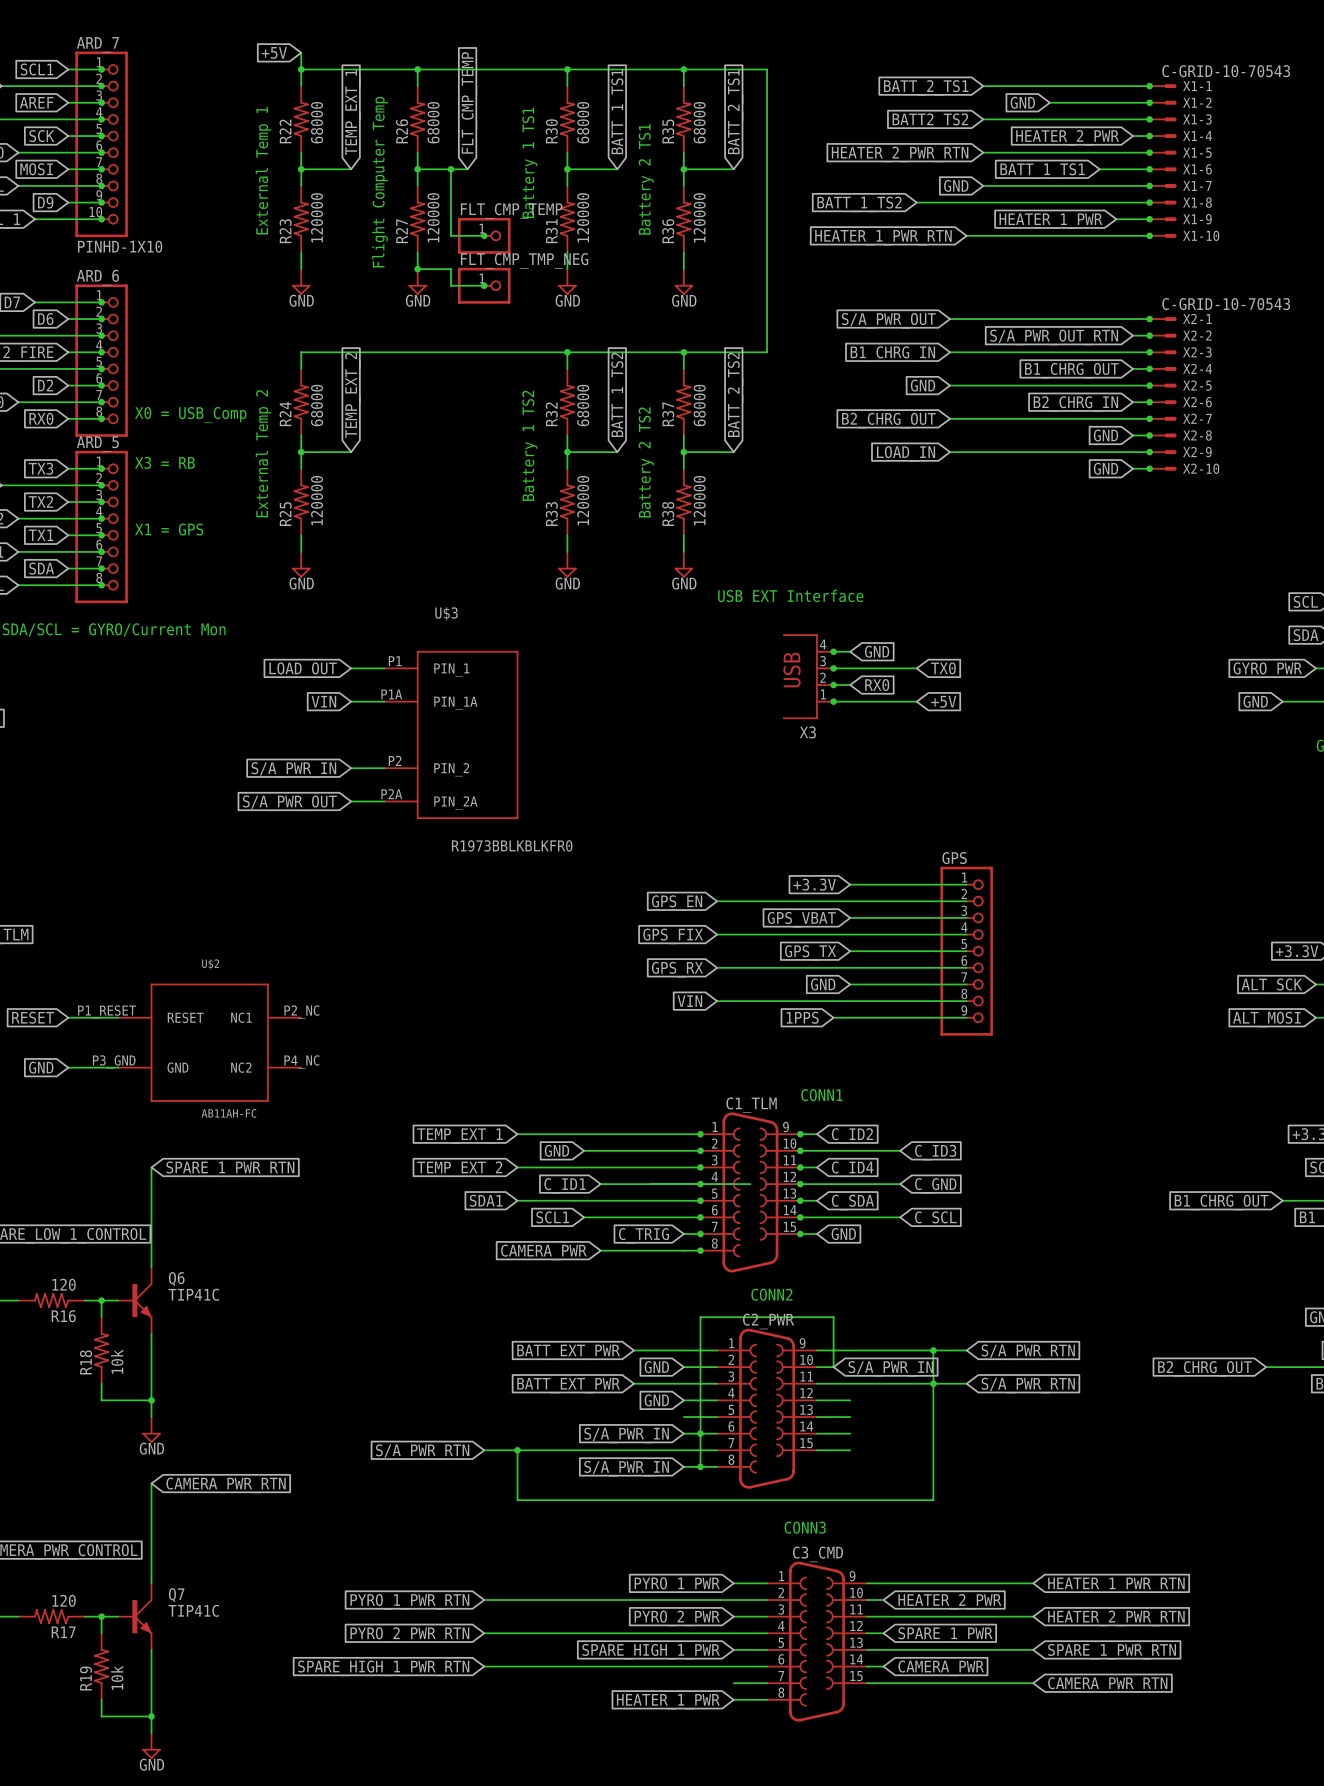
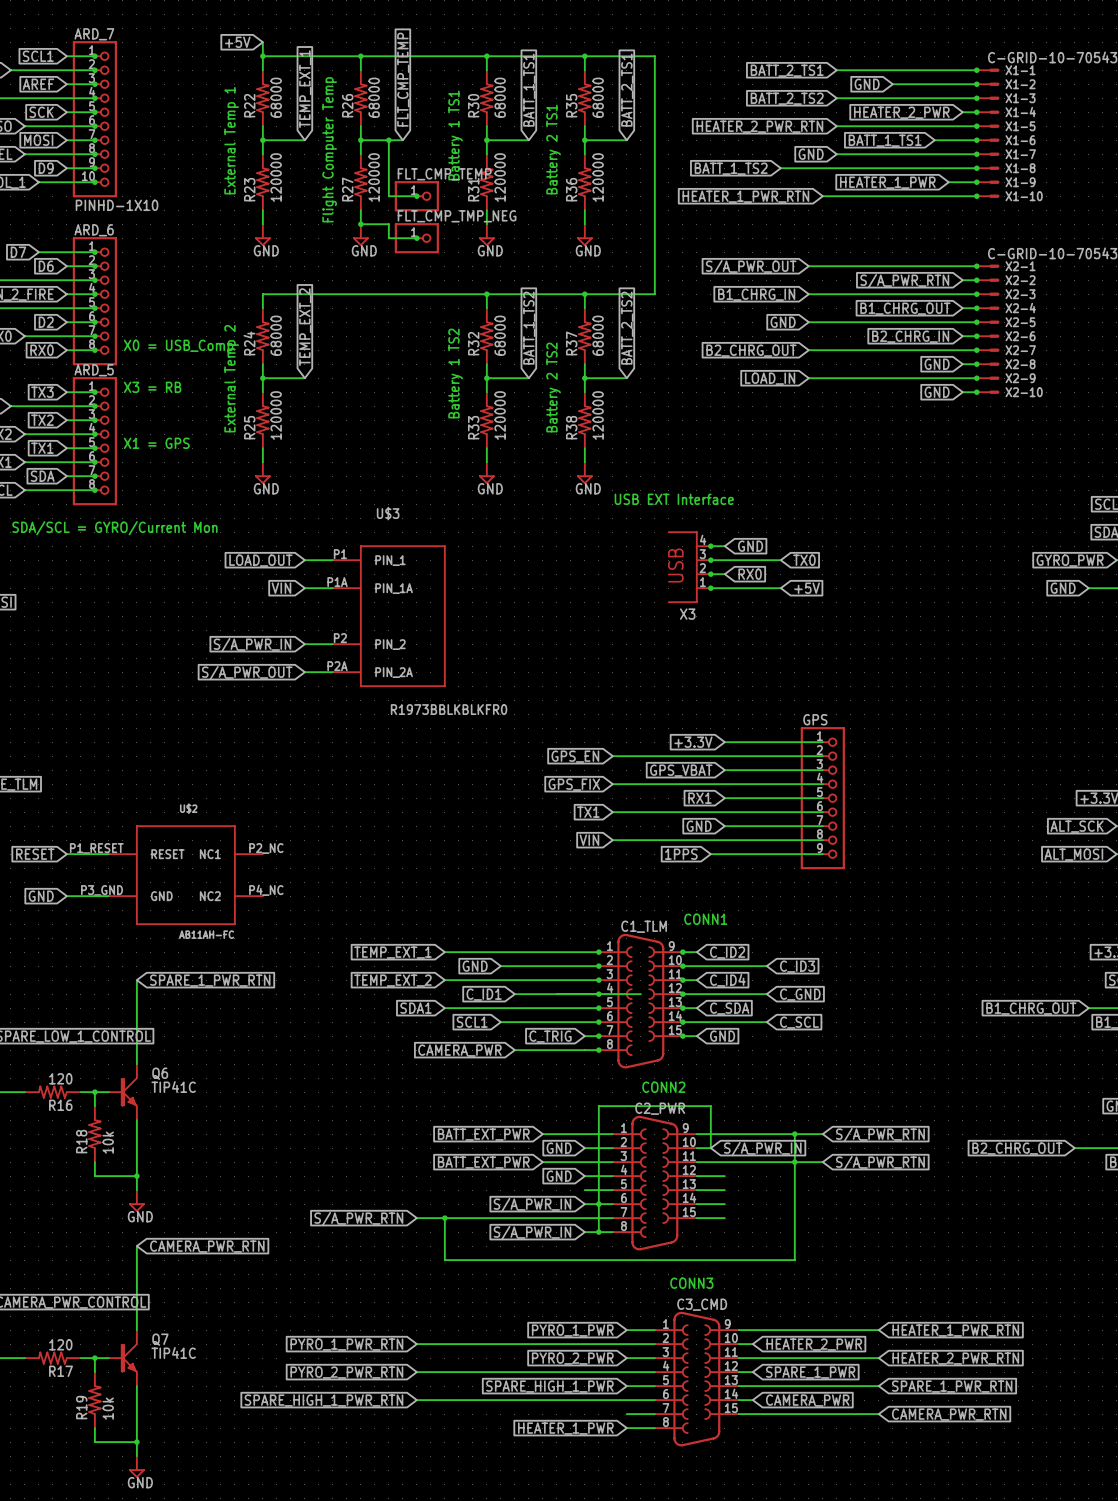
global label: BATT2_TS2 (930, 121) -> BATT_2_TS2 (787, 98)
global label: S/A_PWR_OUT_RTN (1054, 337) -> S/A_PWR_RTN (904, 281)
global label: GPS_TX (810, 952) -> RX1 (699, 798)
global label: GPS_RX (677, 969) -> TX1 (588, 812)

